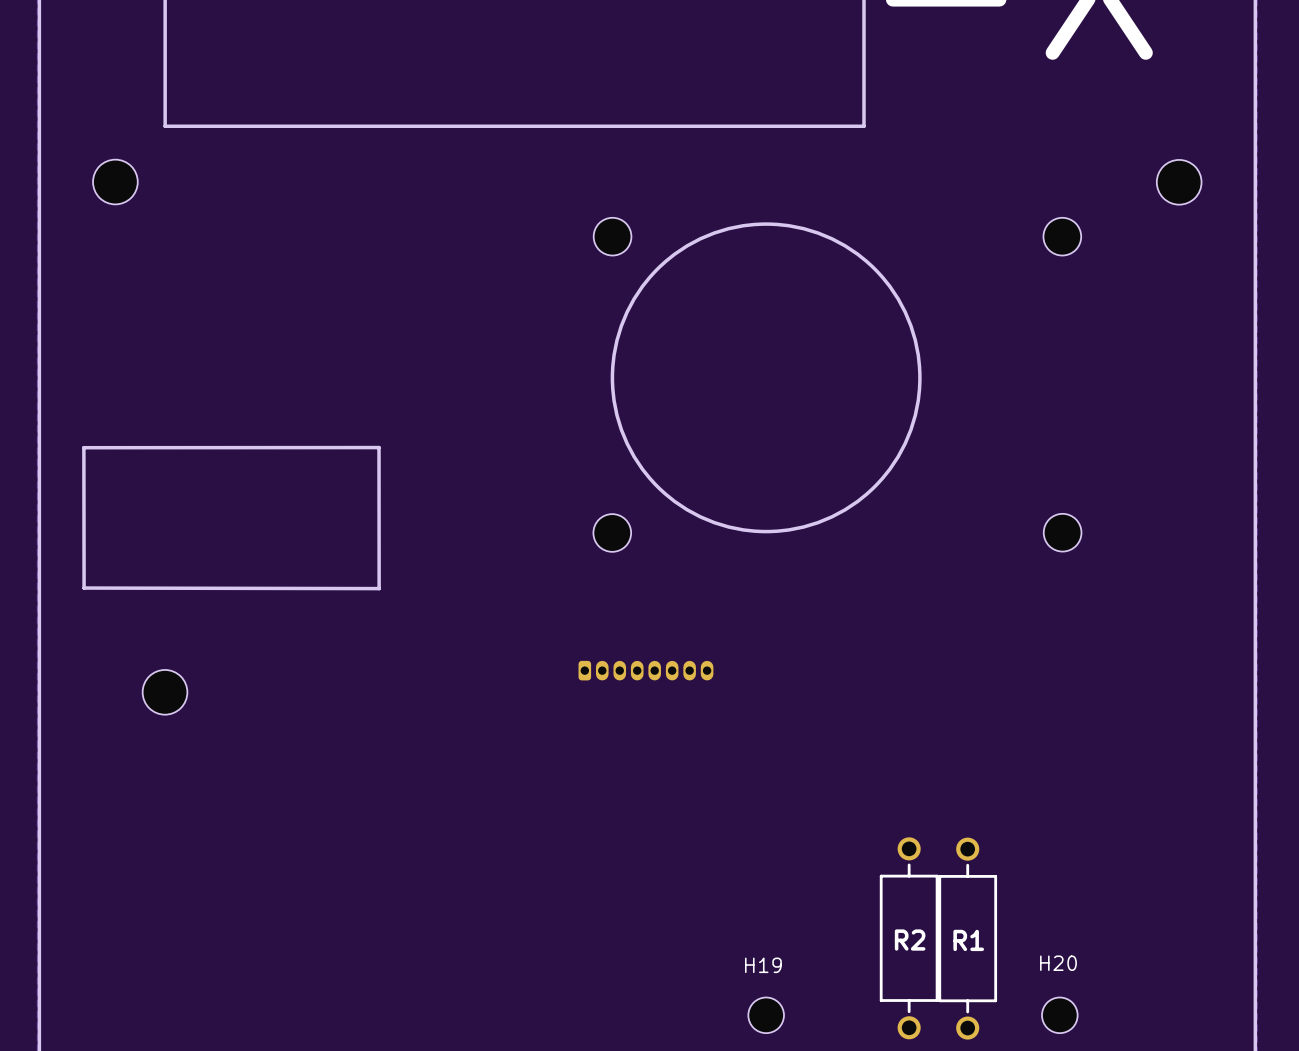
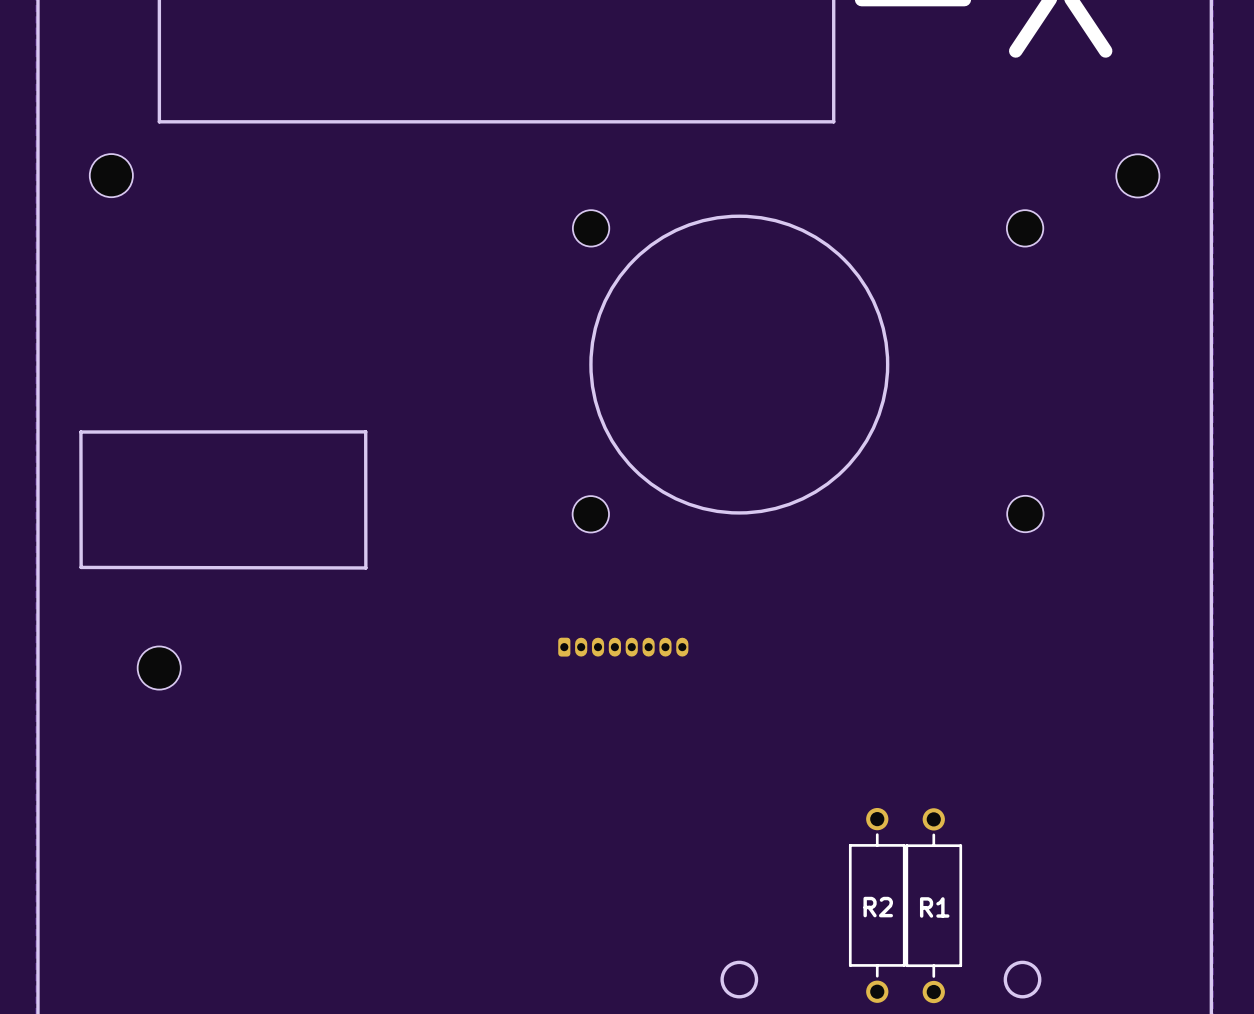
round board edge: none -> [720, 960, 759, 999]
round board edge: none -> [1003, 960, 1042, 999]
H19: (766, 1015) -> none
H20: (1059, 1015) -> none

